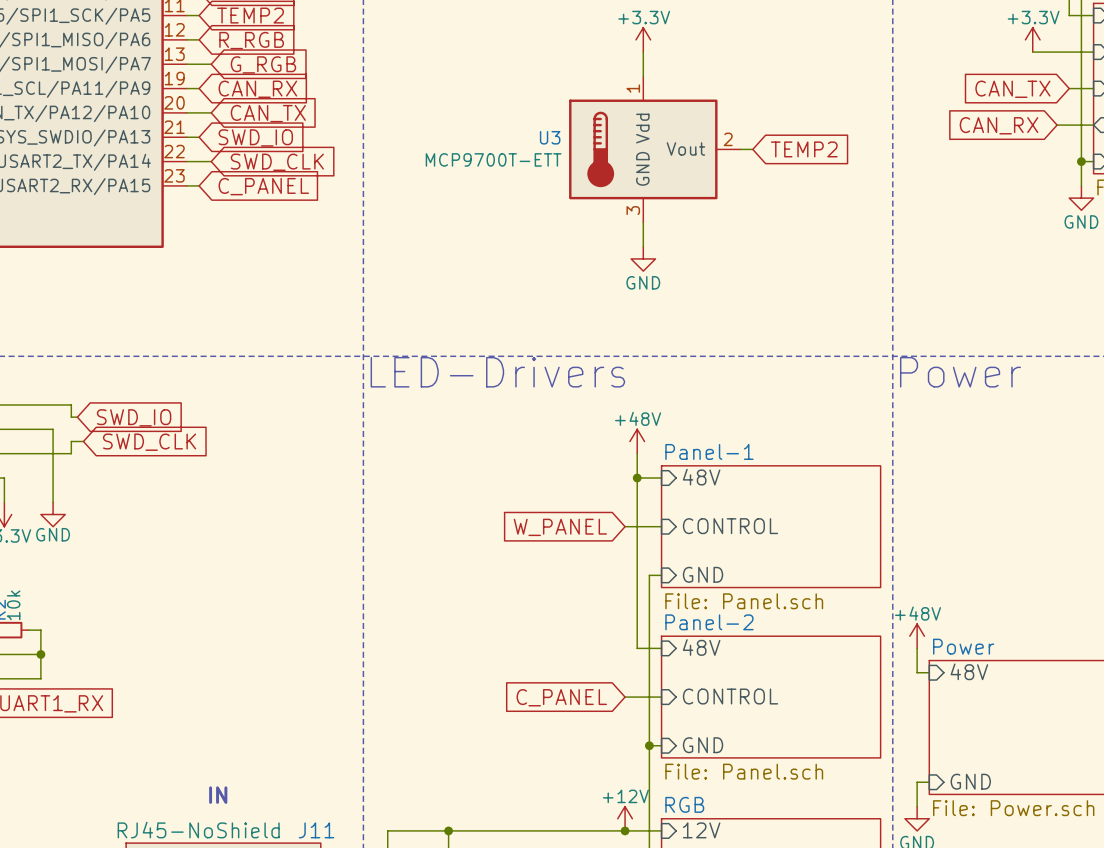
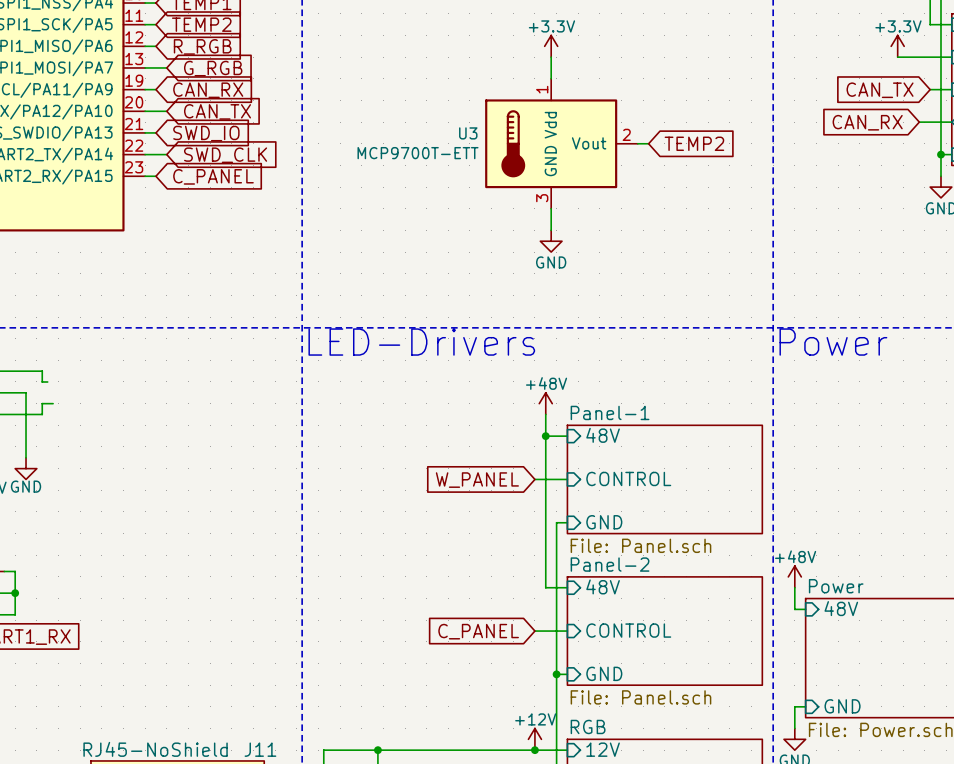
global label: SWD_IO (134, 417) -> none
global label: SWD_CLK (149, 442) -> none
text: IN (218, 795) -> none

